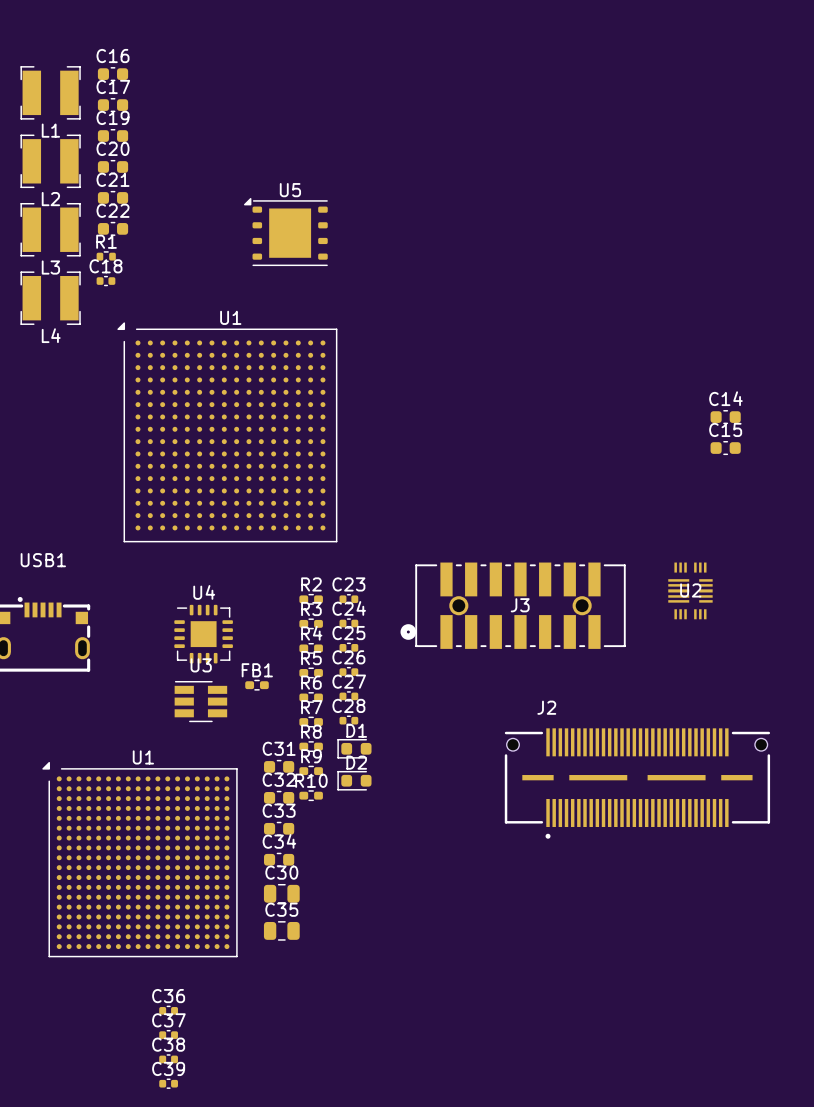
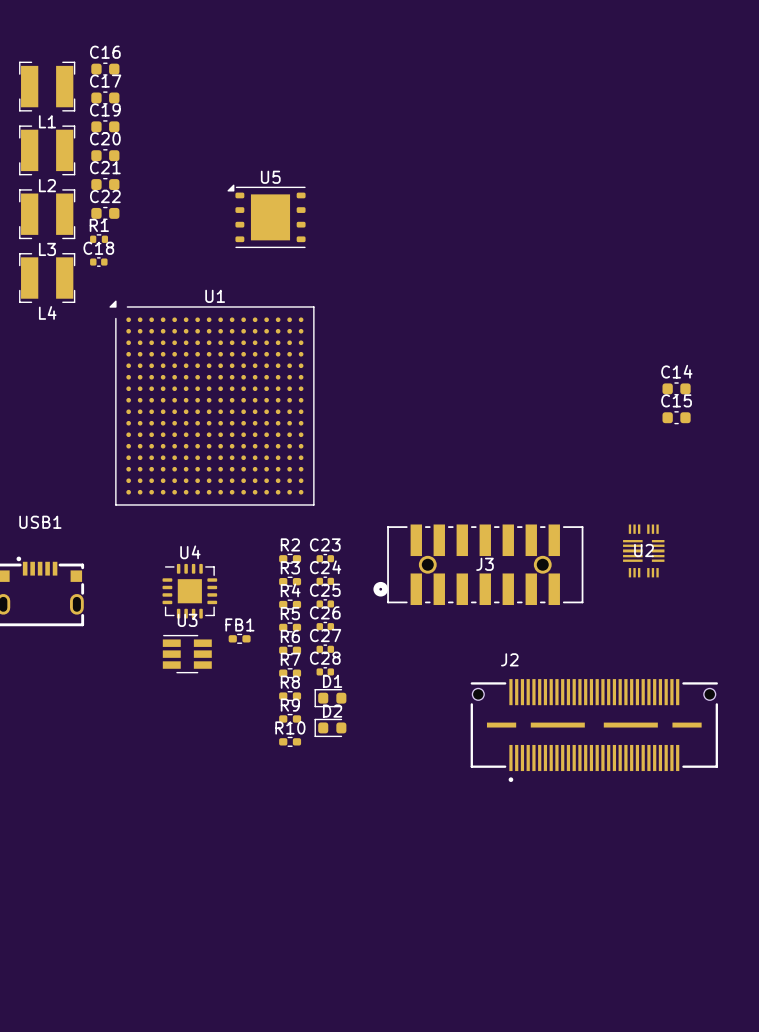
C31: (279, 766) -> none
C32: (279, 797) -> none
C33: (279, 828) -> none
U1: (140, 859) -> none
C34: (279, 859) -> none
C30: (281, 893) -> none
C35: (281, 930) -> none
C36: (168, 1010) -> none
C37: (168, 1035) -> none
C38: (168, 1059) -> none
C39: (168, 1083) -> none

